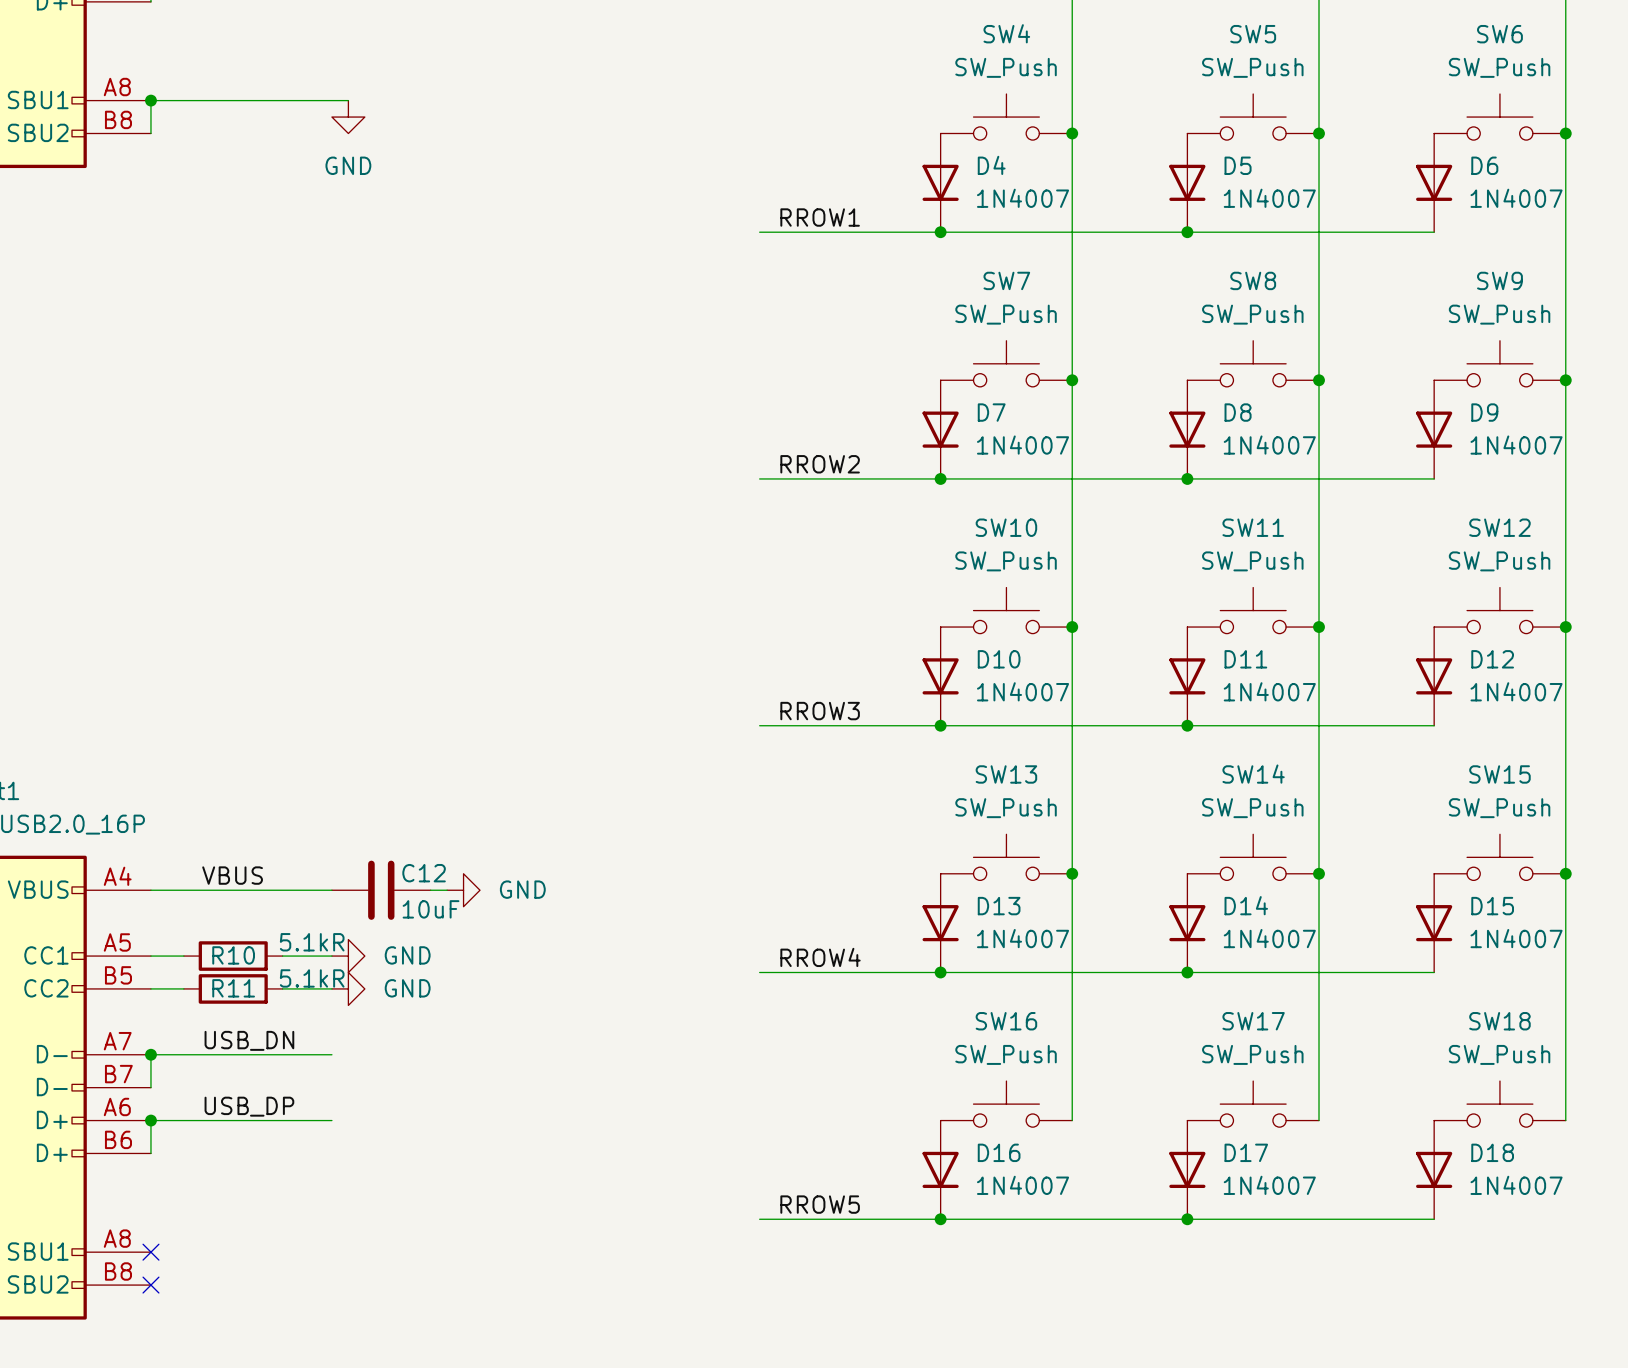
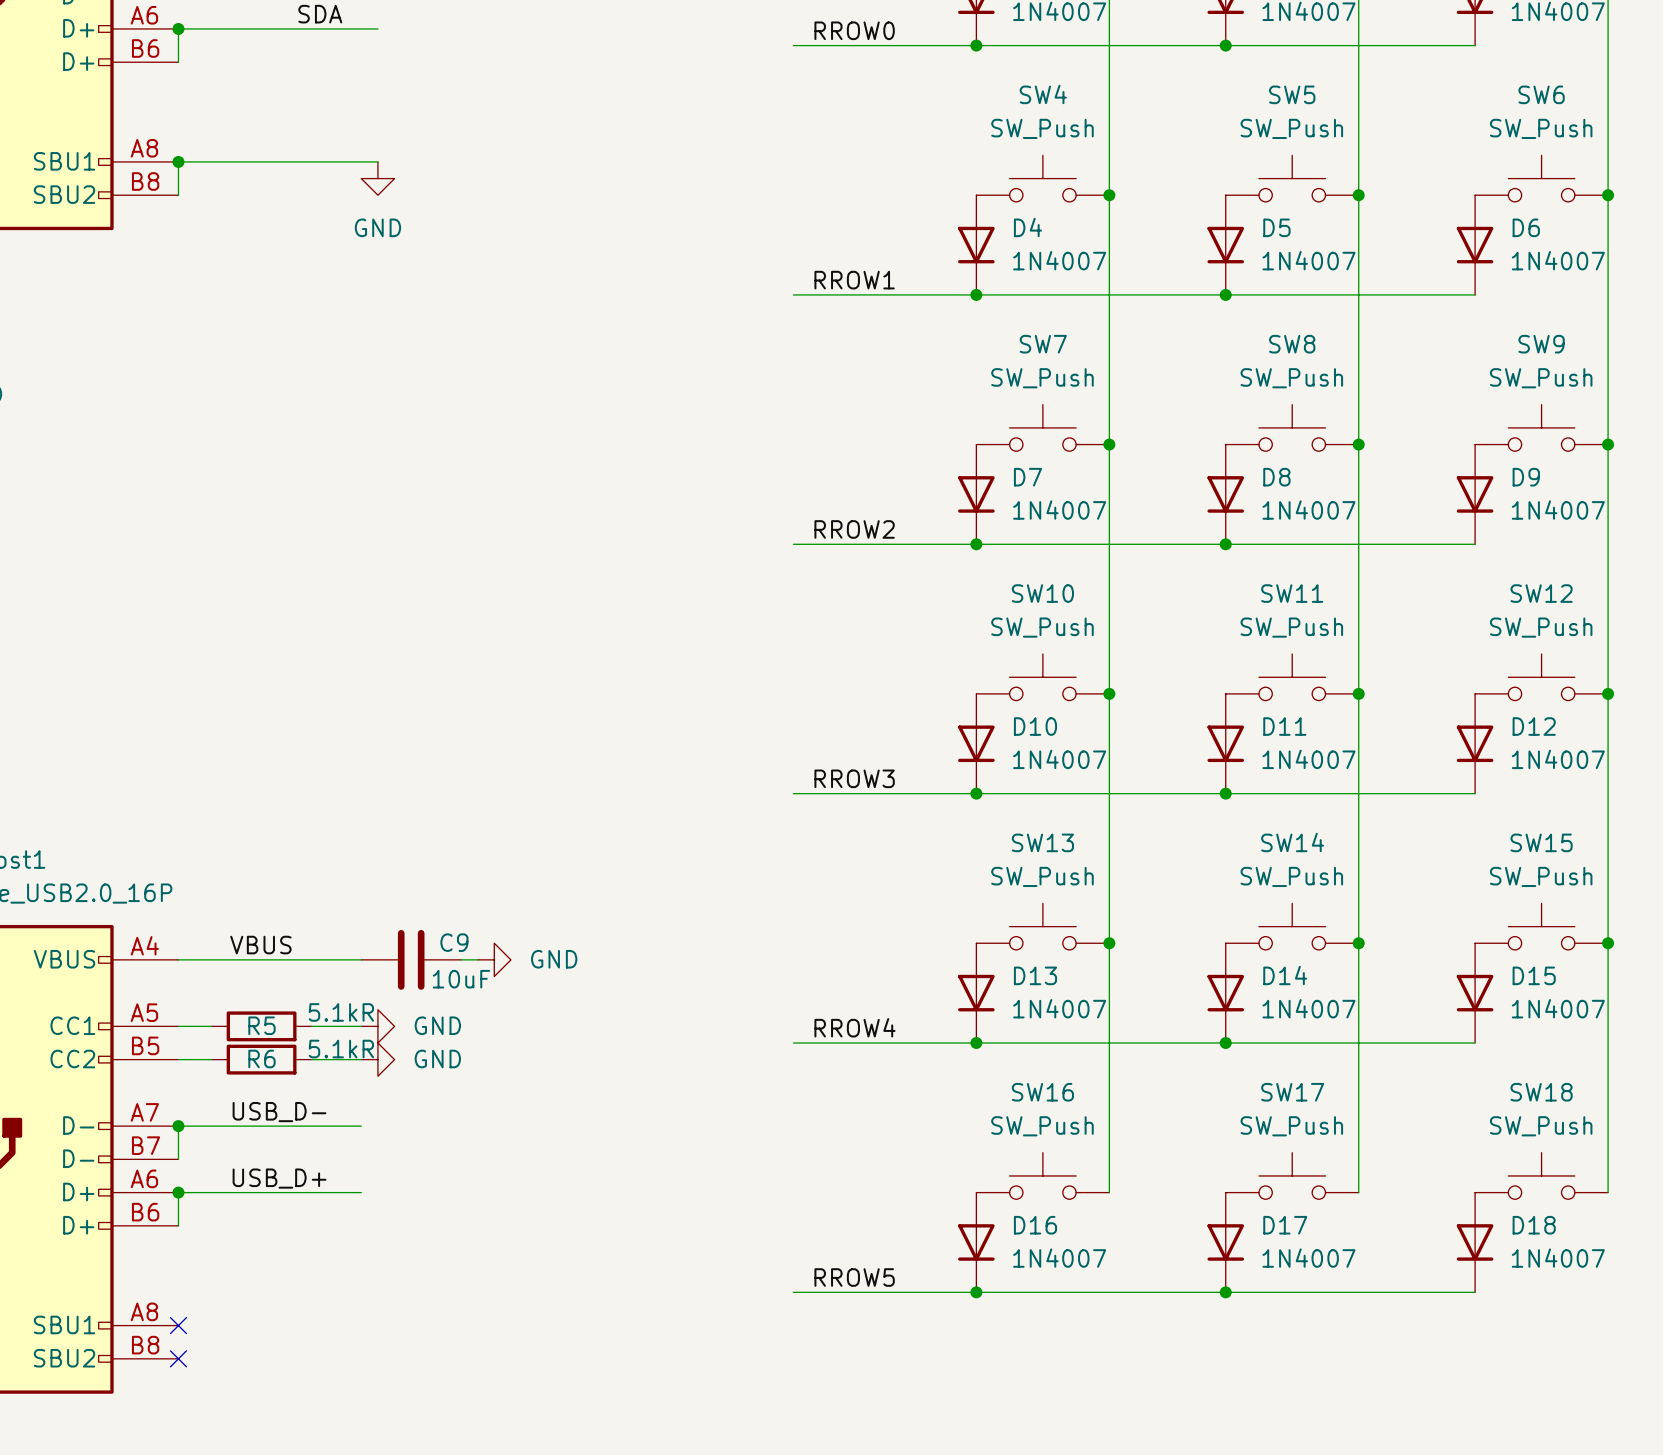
C12 name: C12 (424, 873) -> C9 (454, 942)
R10 name: R10 (233, 955) -> R5 (261, 1025)
R11 name: R11 (233, 988) -> R6 (261, 1059)
label: USB_DN (249, 1040) -> USB_D- (279, 1112)
label: USB_DP (249, 1106) -> USB_D+ (279, 1178)

